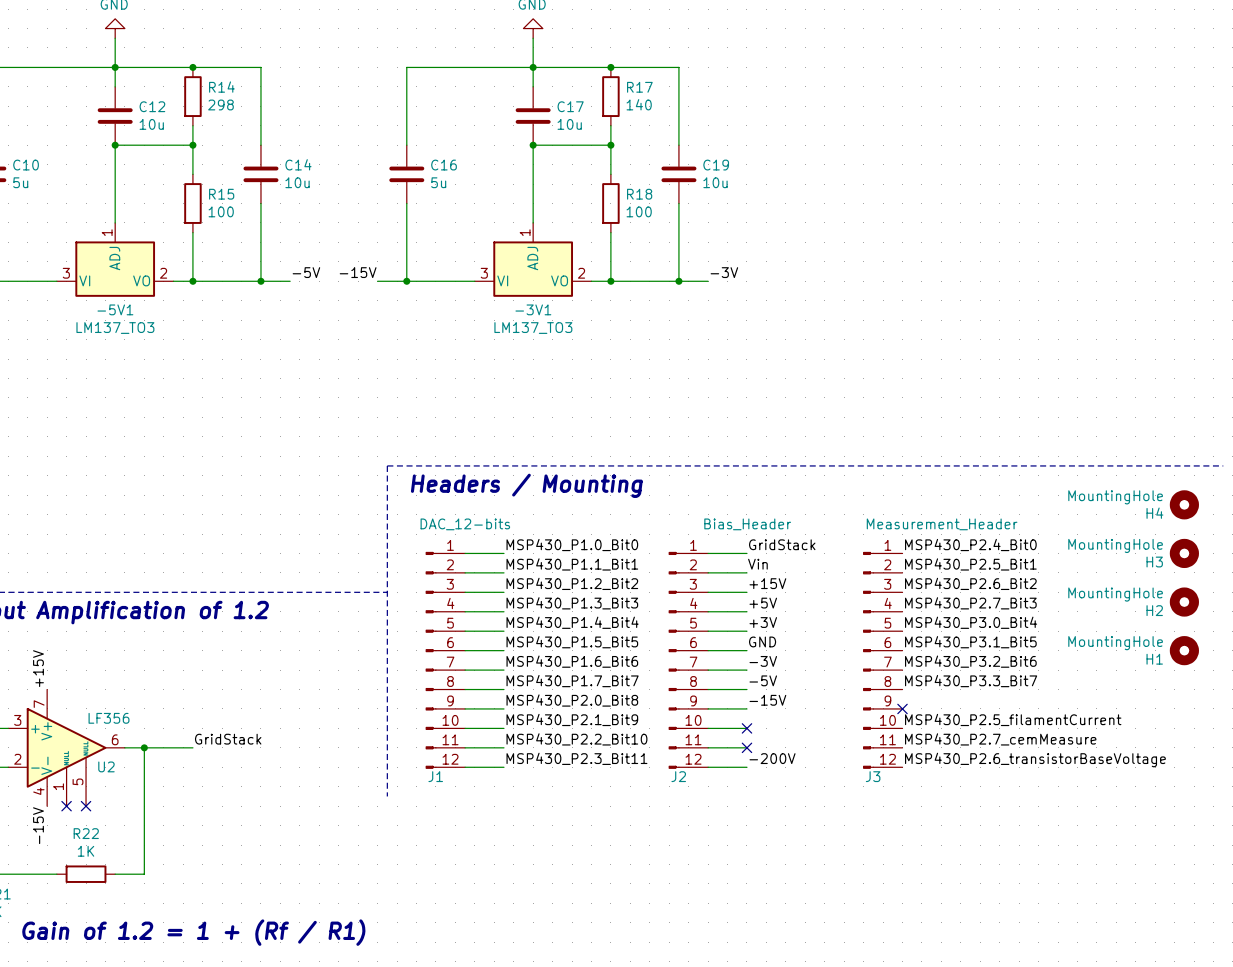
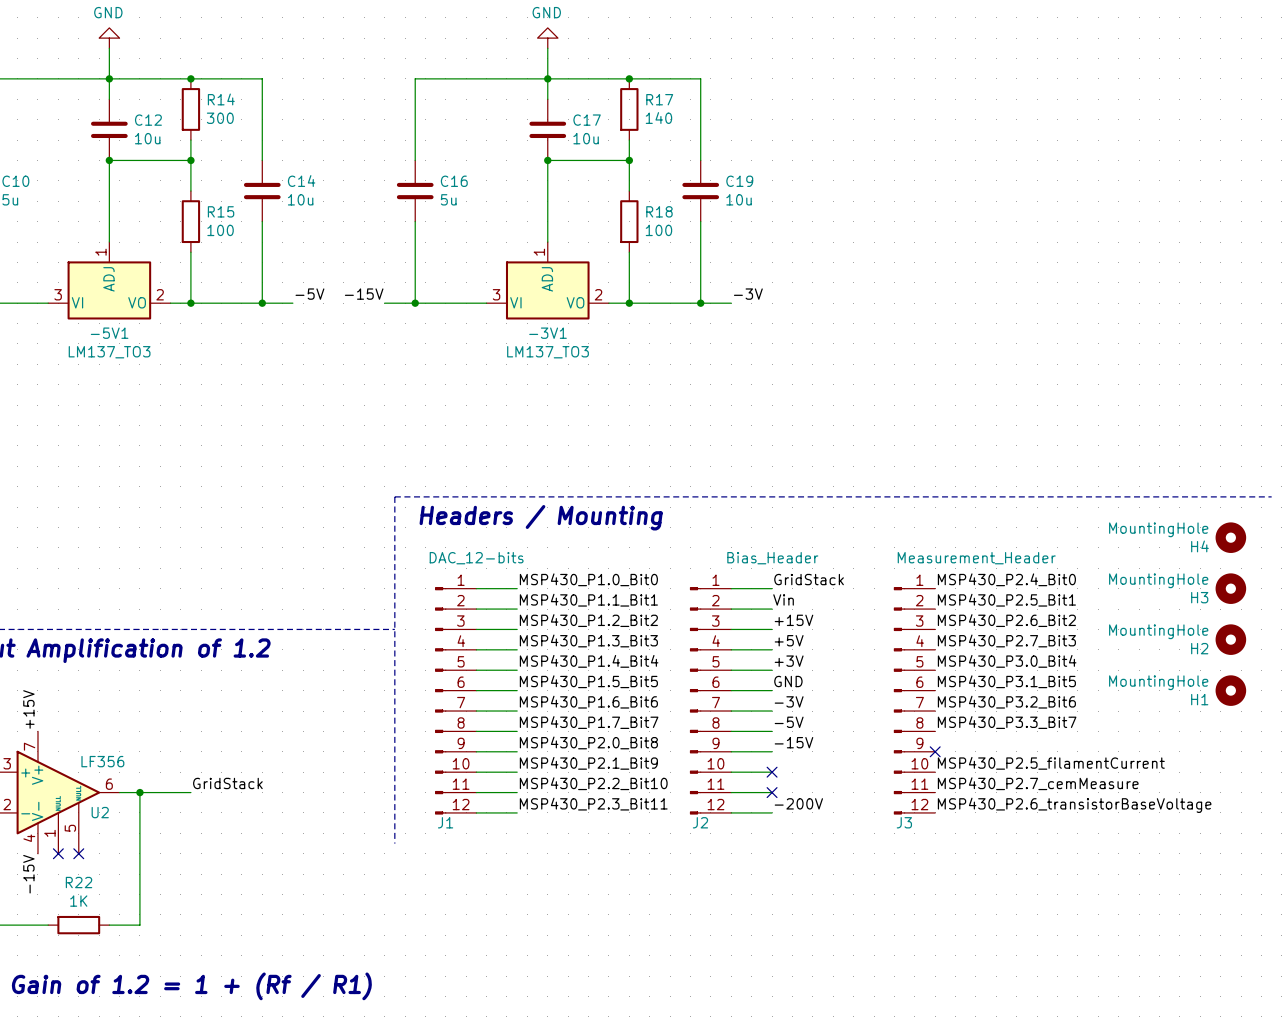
R14 value: 298 (220, 104) -> 300 (220, 118)

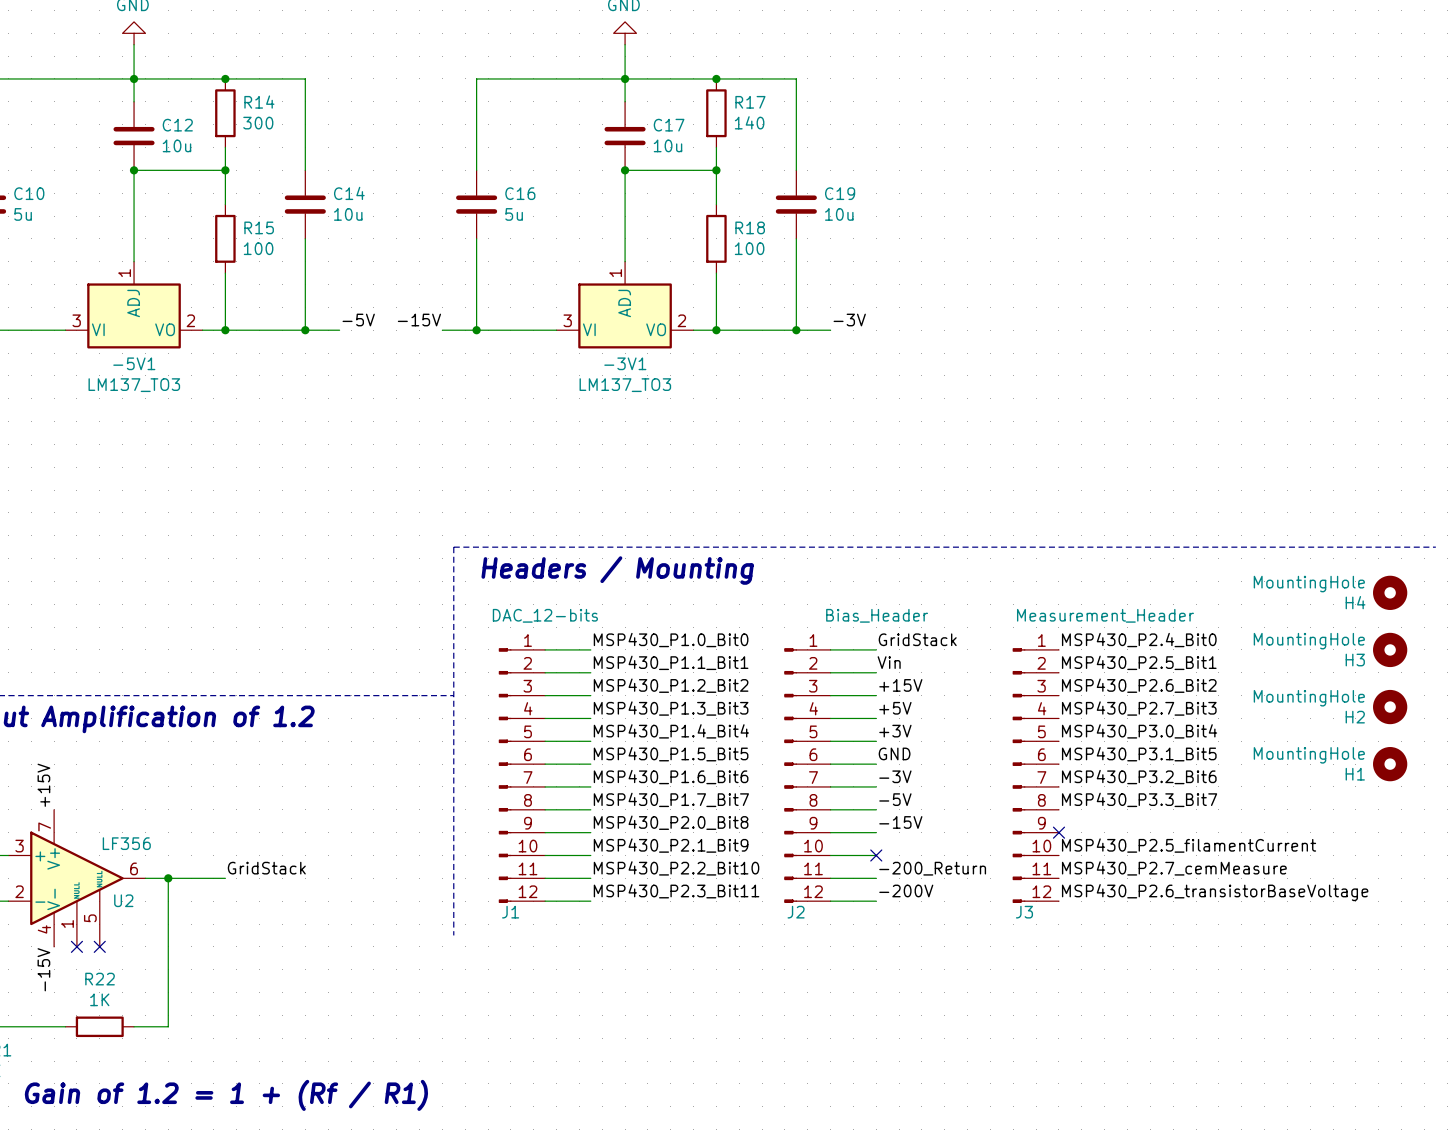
label: none -> -200_Return (932, 868)
no-connect mark: (772, 792) -> none

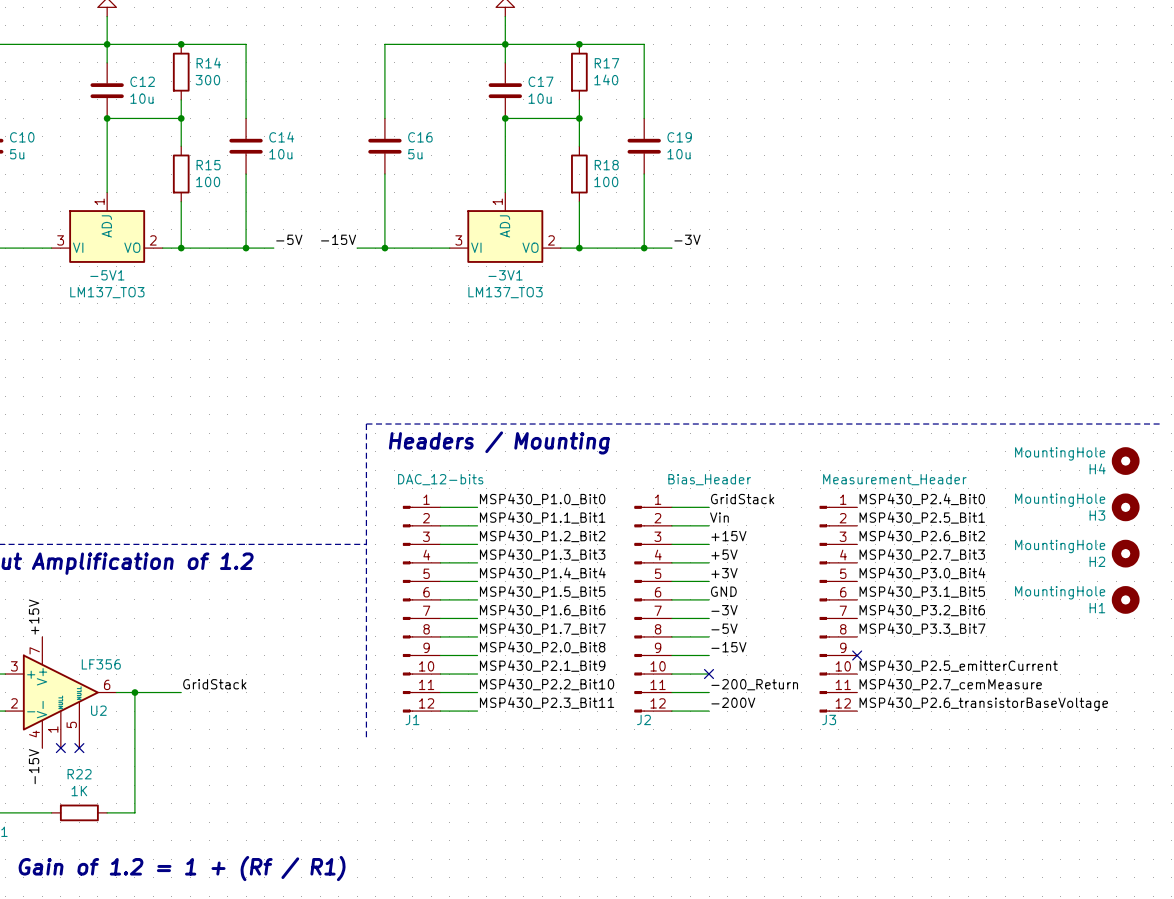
label: MSP430_P2.5_filamentCurrent (1189, 845) -> MSP430_P2.5_emitterCurrent (958, 665)

